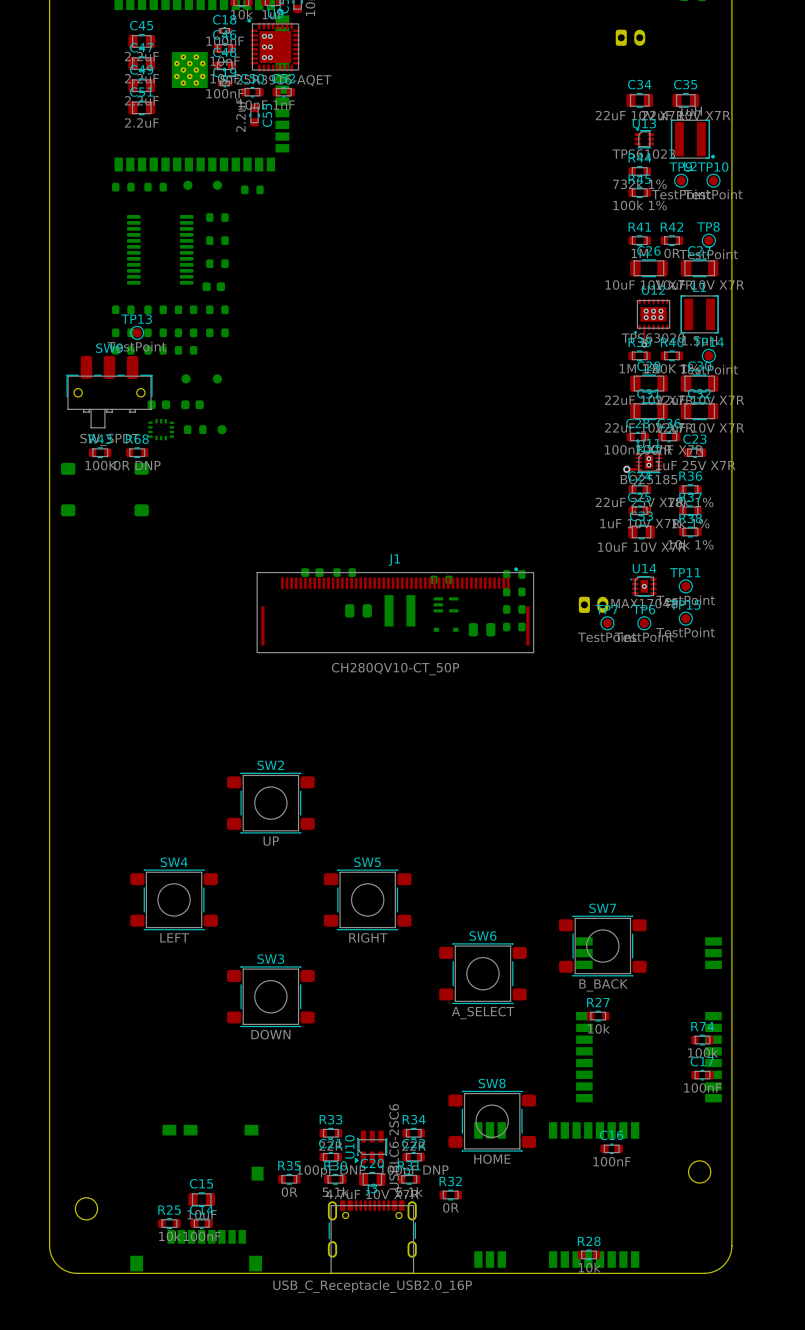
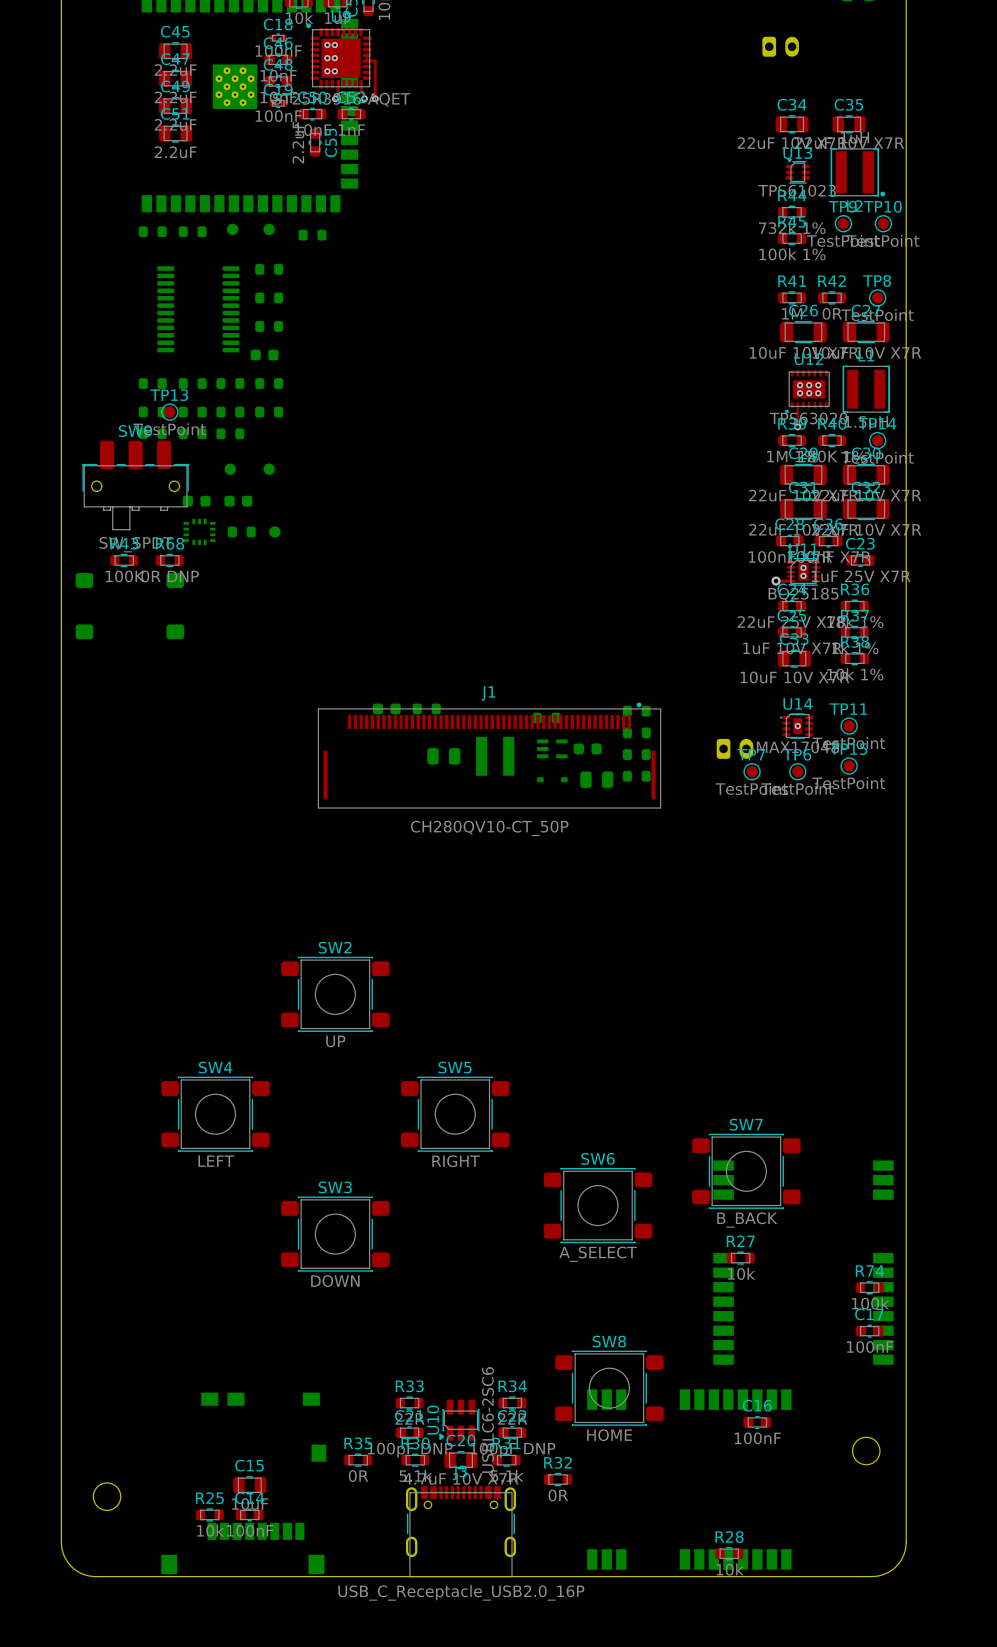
top track: none -> (367, 55) (367, 61) (375, 61) (375, 98)
top track: none -> (338, 88) (335, 98)
top track: none -> (361, 88) (364, 98)
via: none -> (335, 98)
via: none -> (364, 98)
via: none -> (375, 98)
part: none -> (587, 748)

